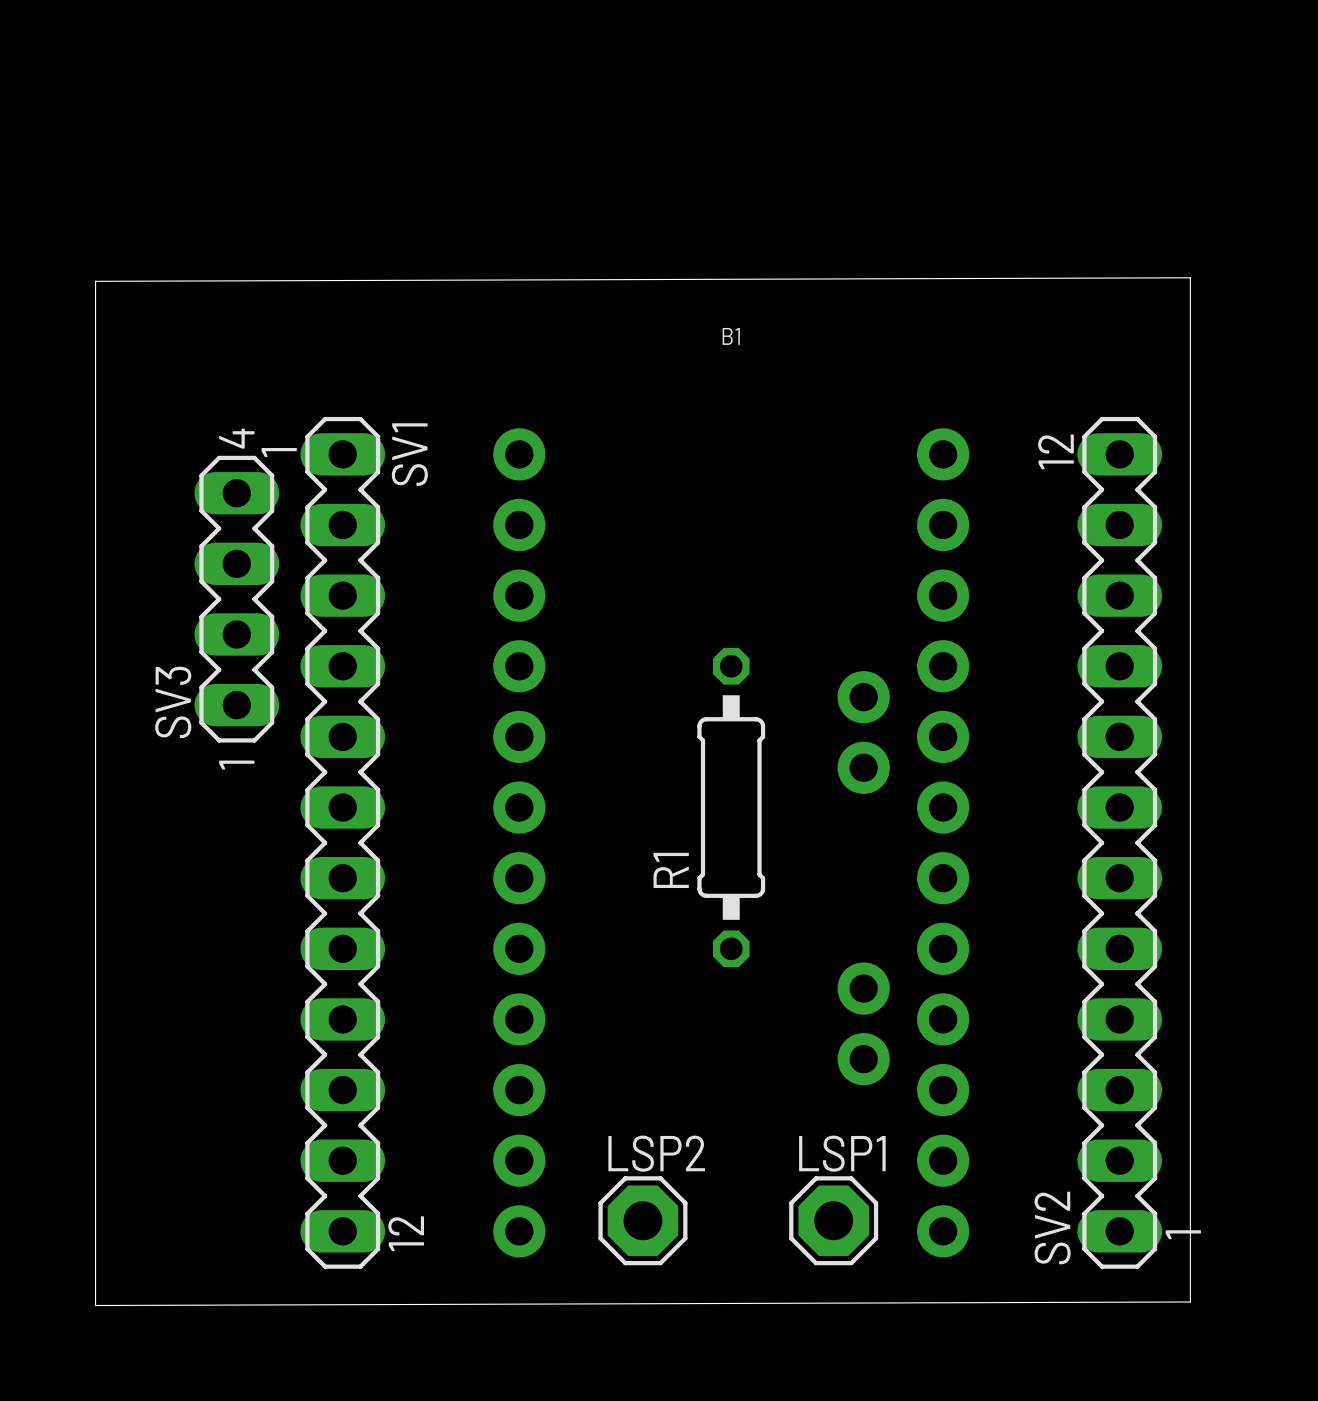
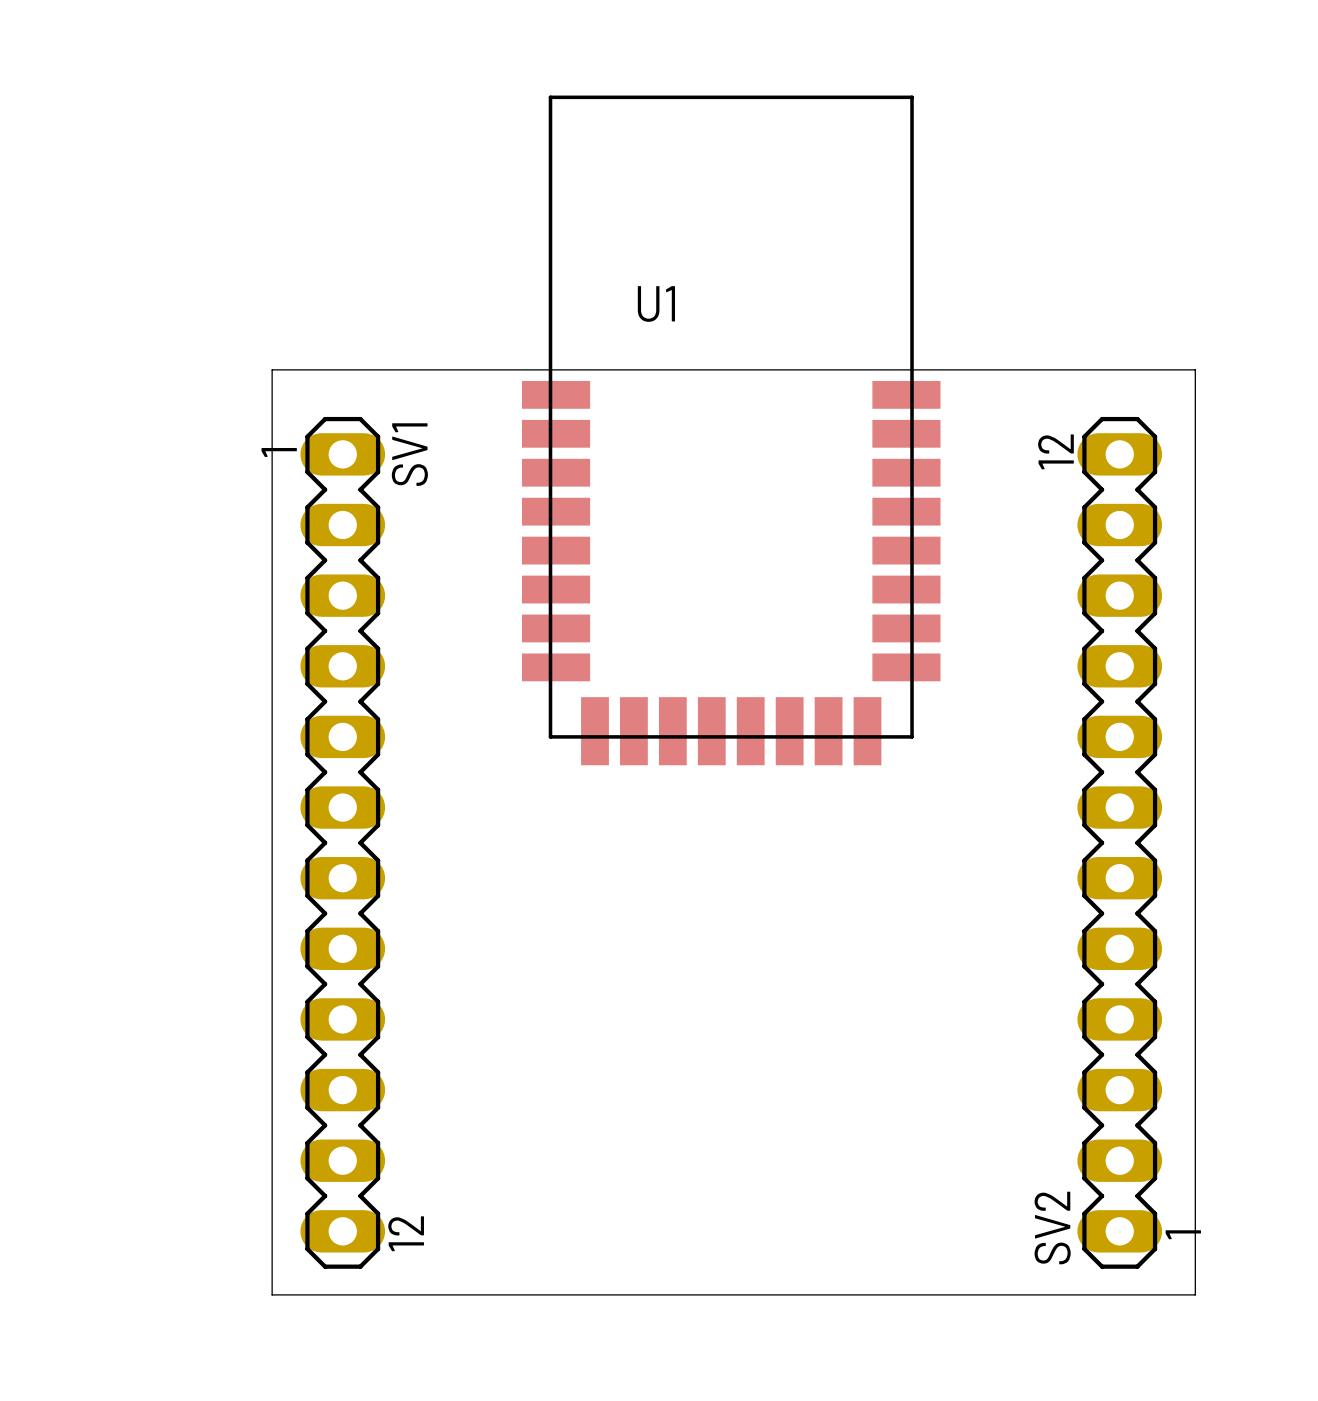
board edge: (1190, 277) (1190, 1301) (95, 1305) (95, 281) (1190, 277) -> (272, 369) (272, 1294) (1195, 1294) (1195, 369) (272, 369)
U1: none -> (731, 430)
SV3: (236, 599) -> none
R1: (731, 807) -> none
B1: (731, 842) -> none
LSP2: (642, 1220) -> none
LSP1: (833, 1220) -> none

